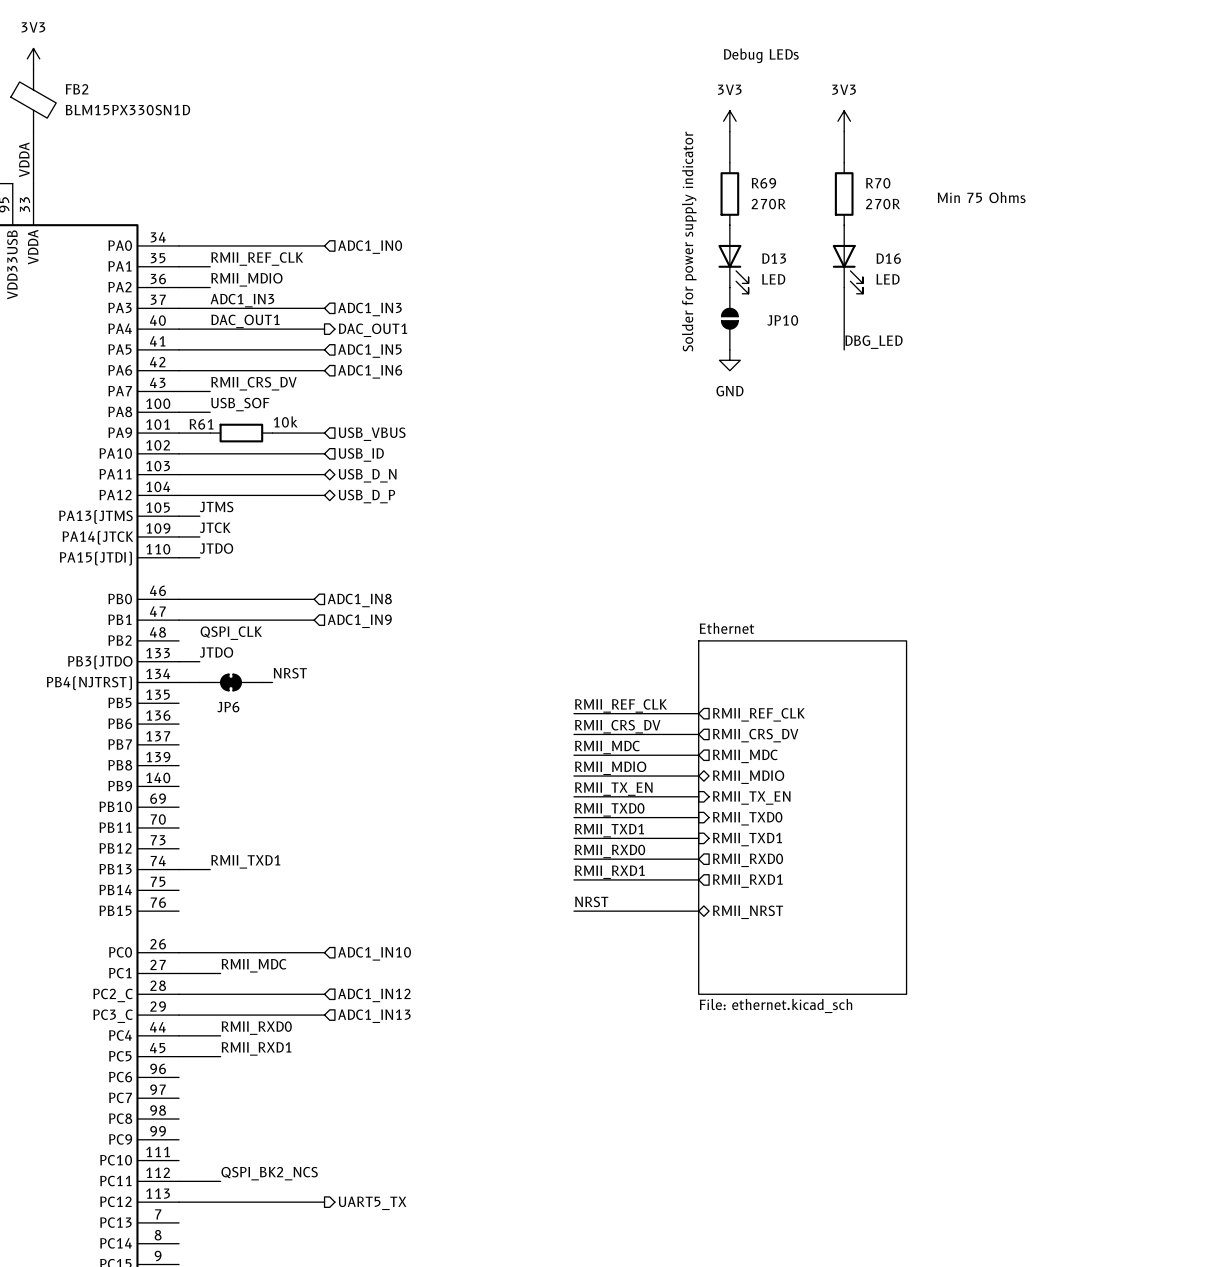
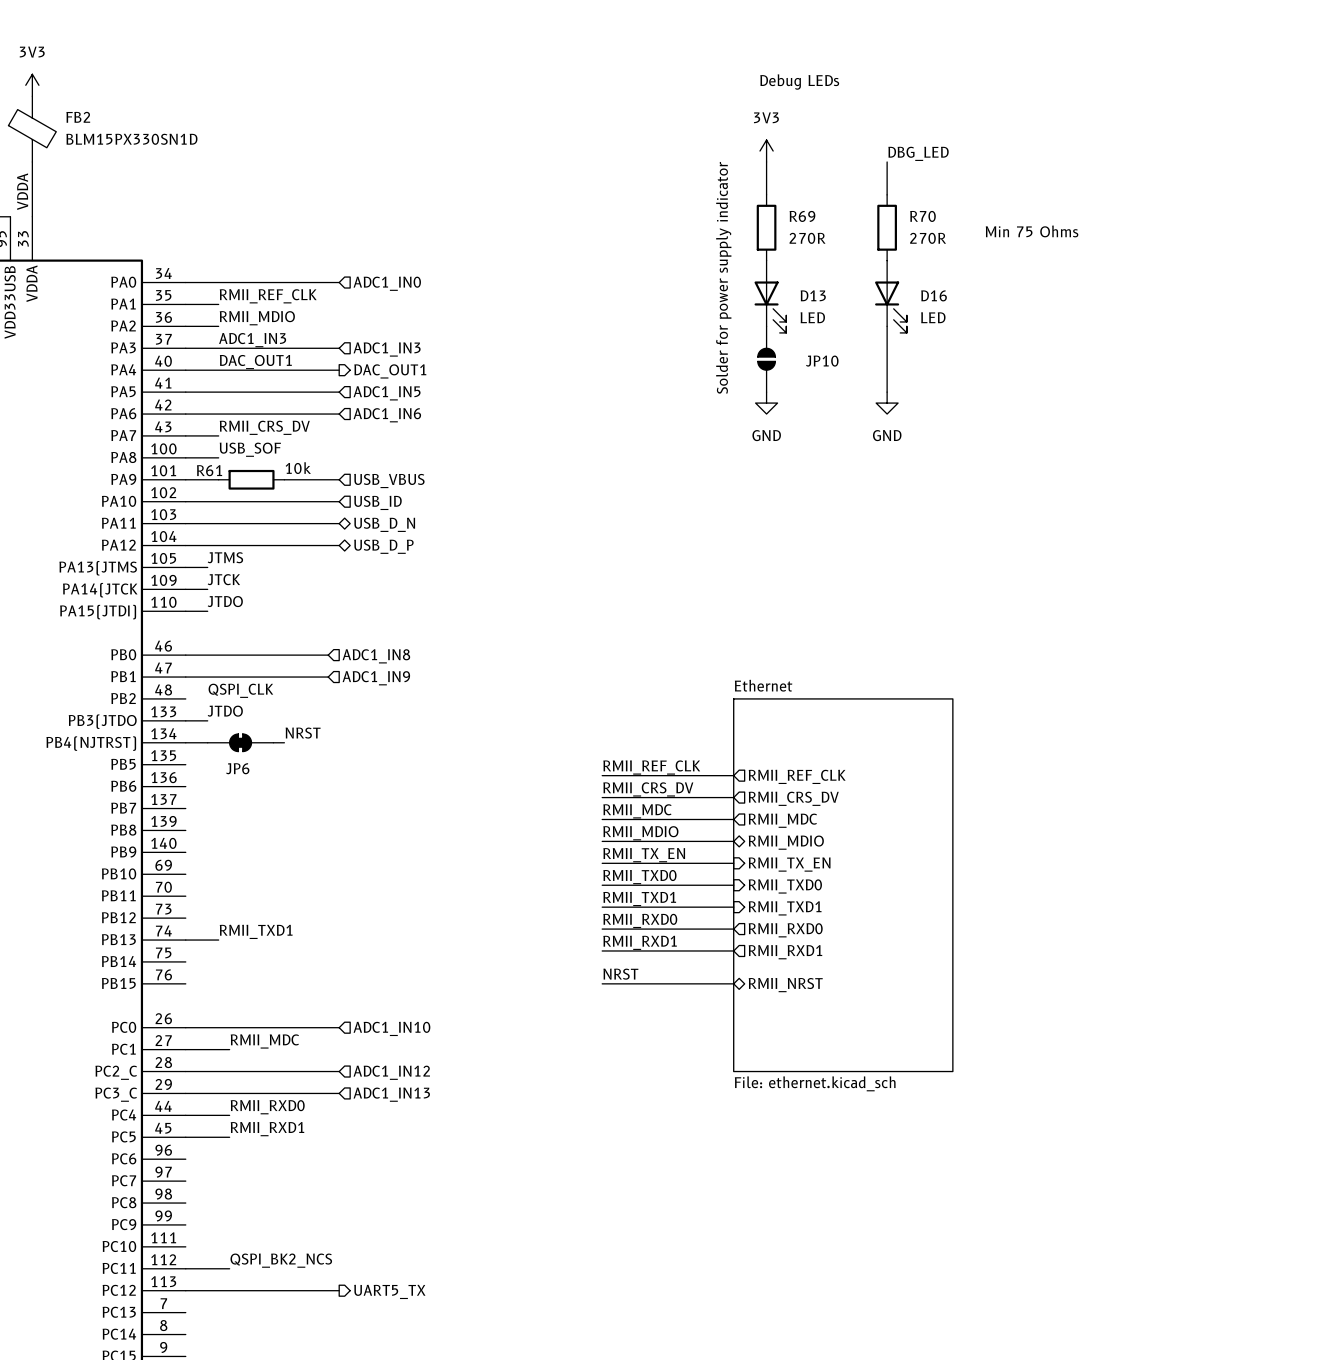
power symbol: 3V3 (844, 121) -> none
label: none -> DBG_LED (918, 153)
label: DBG_LED (873, 342) -> none
power symbol: none -> GND (887, 403)

